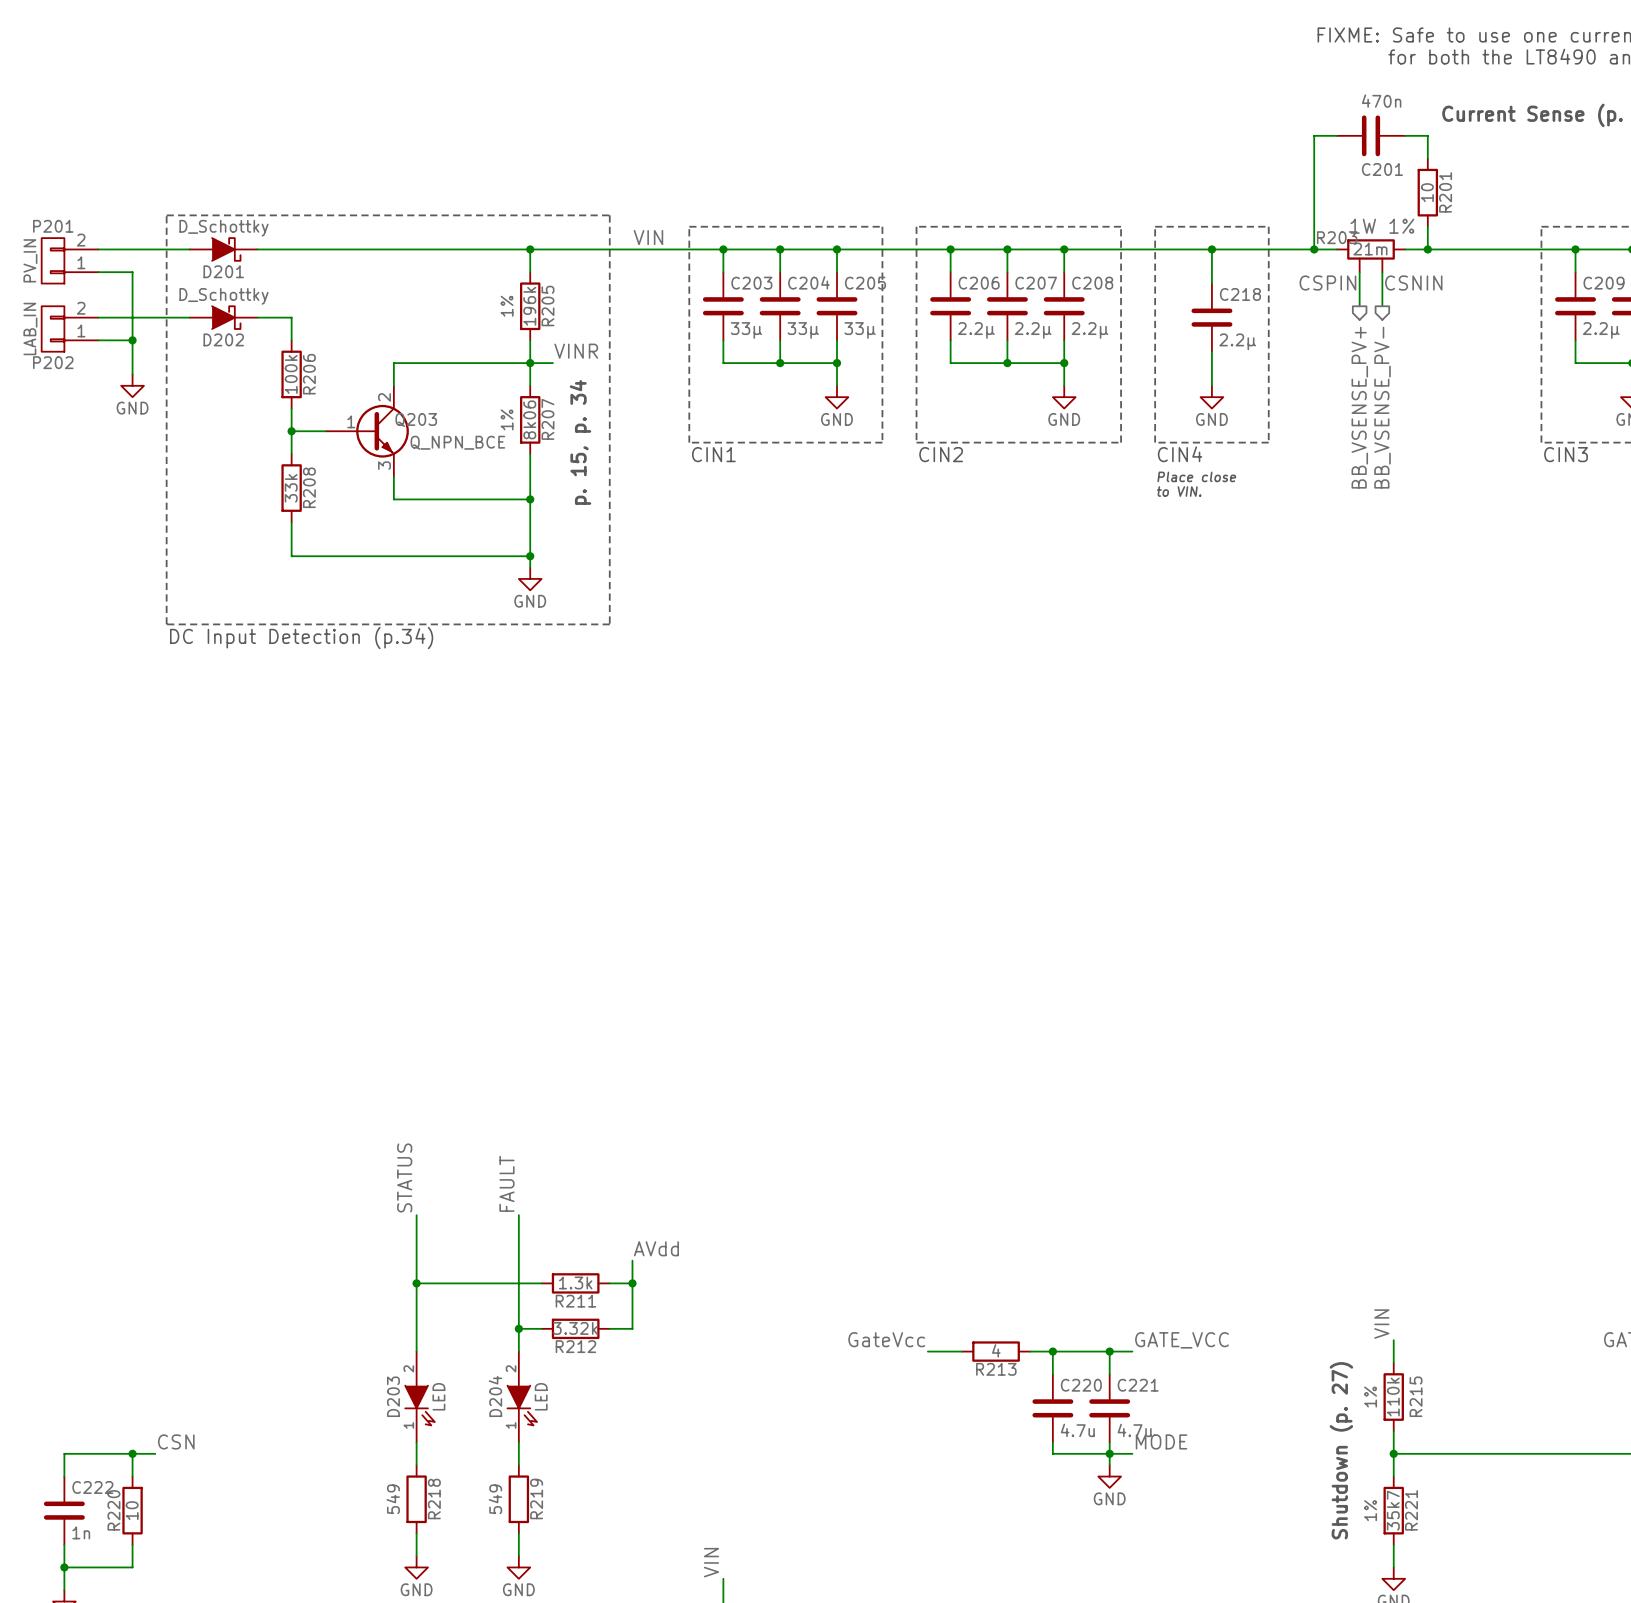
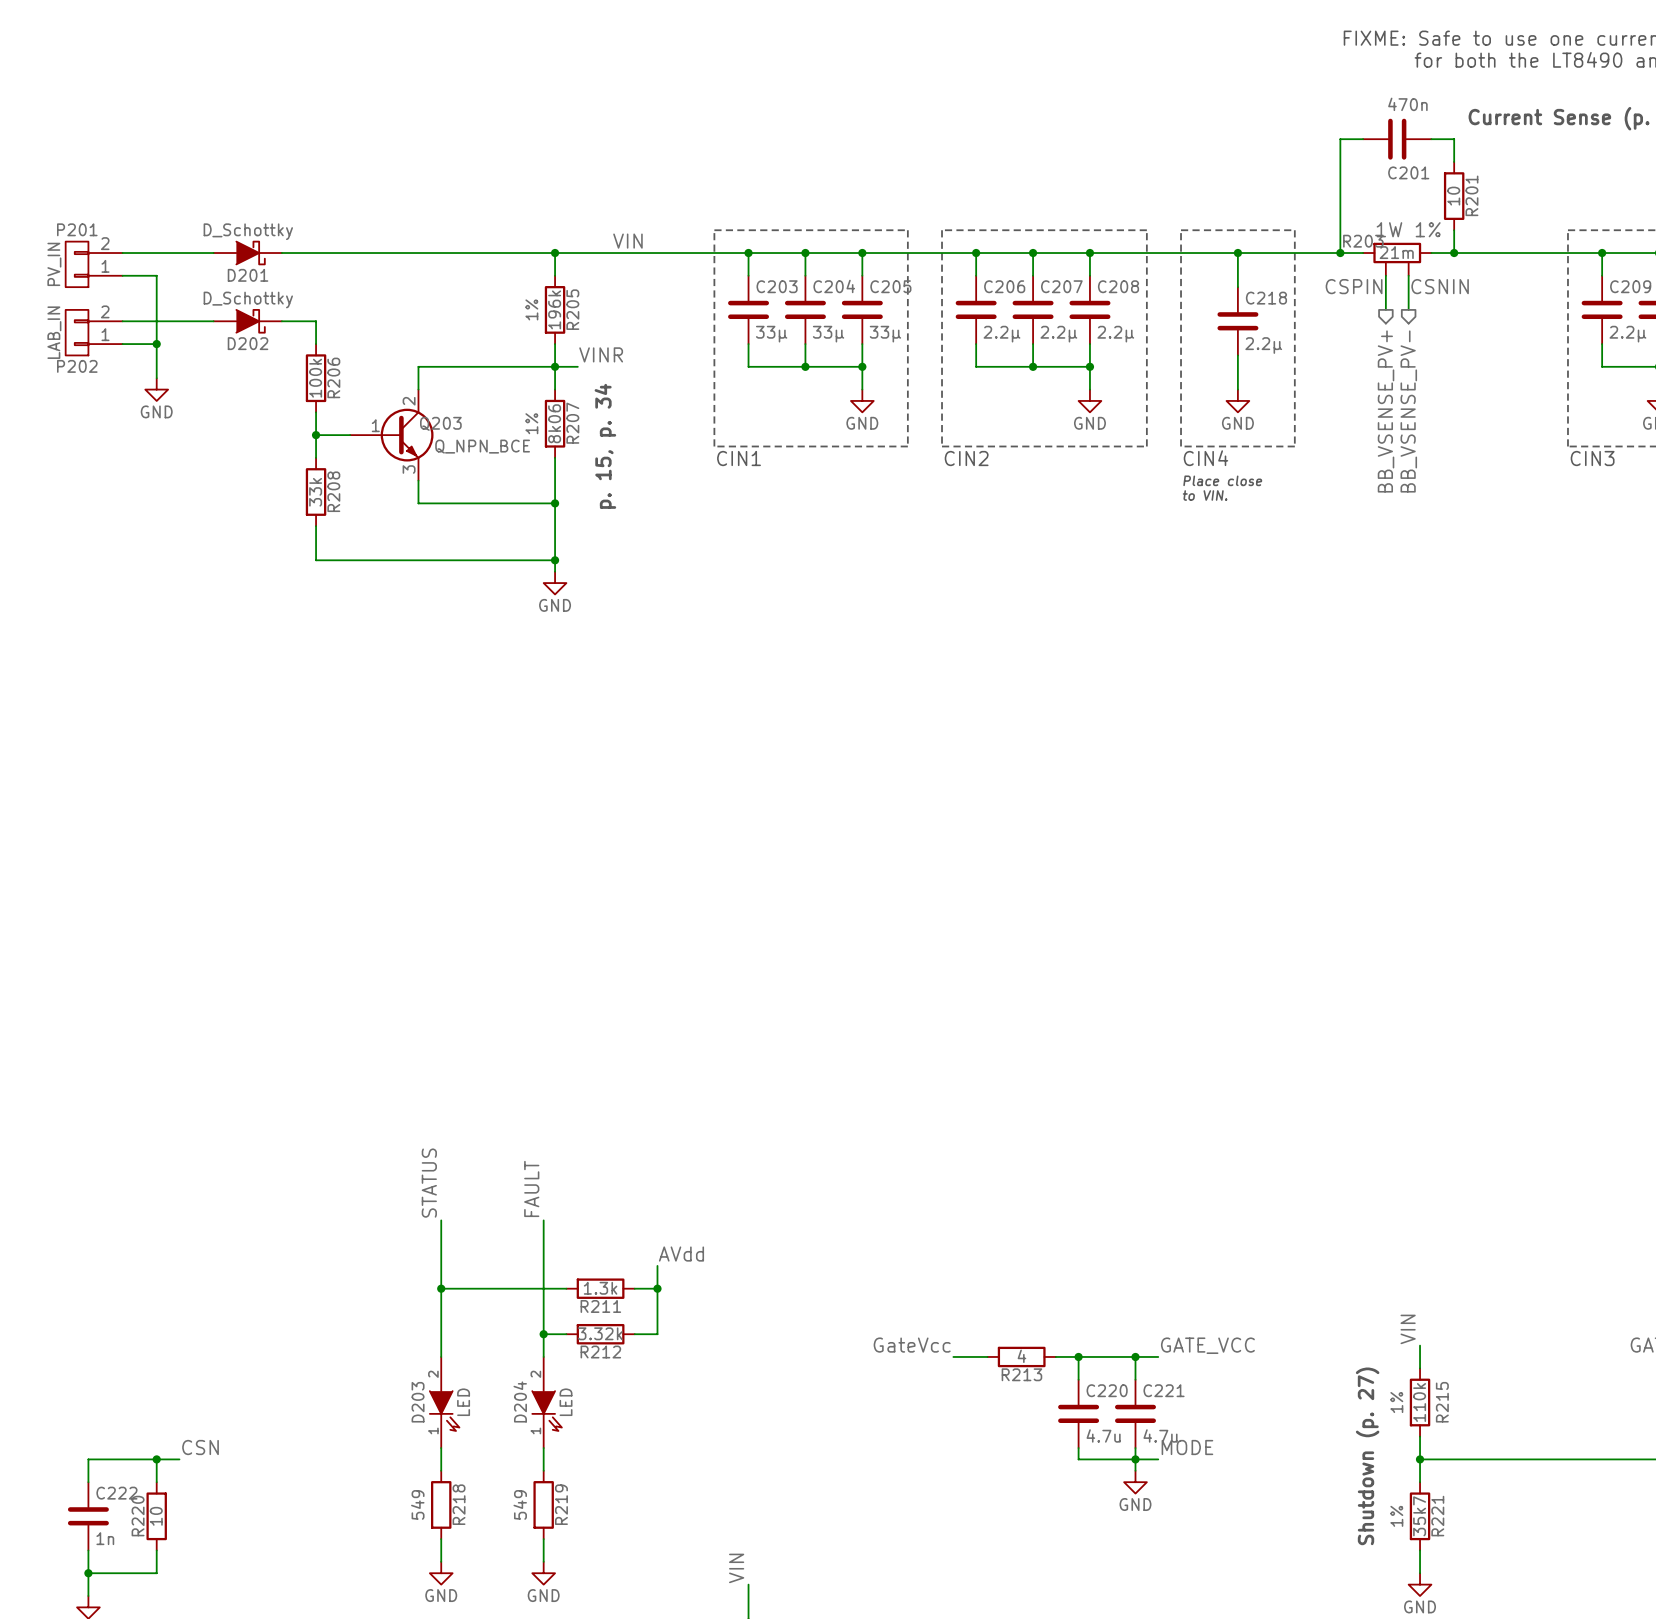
line: (166, 215) (609, 215) (609, 624) (166, 624) (166, 215) -> none
label position: VIN (648, 237) -> VIN (627, 241)
text: DC Input Detection (p.34) (301, 638) -> none

